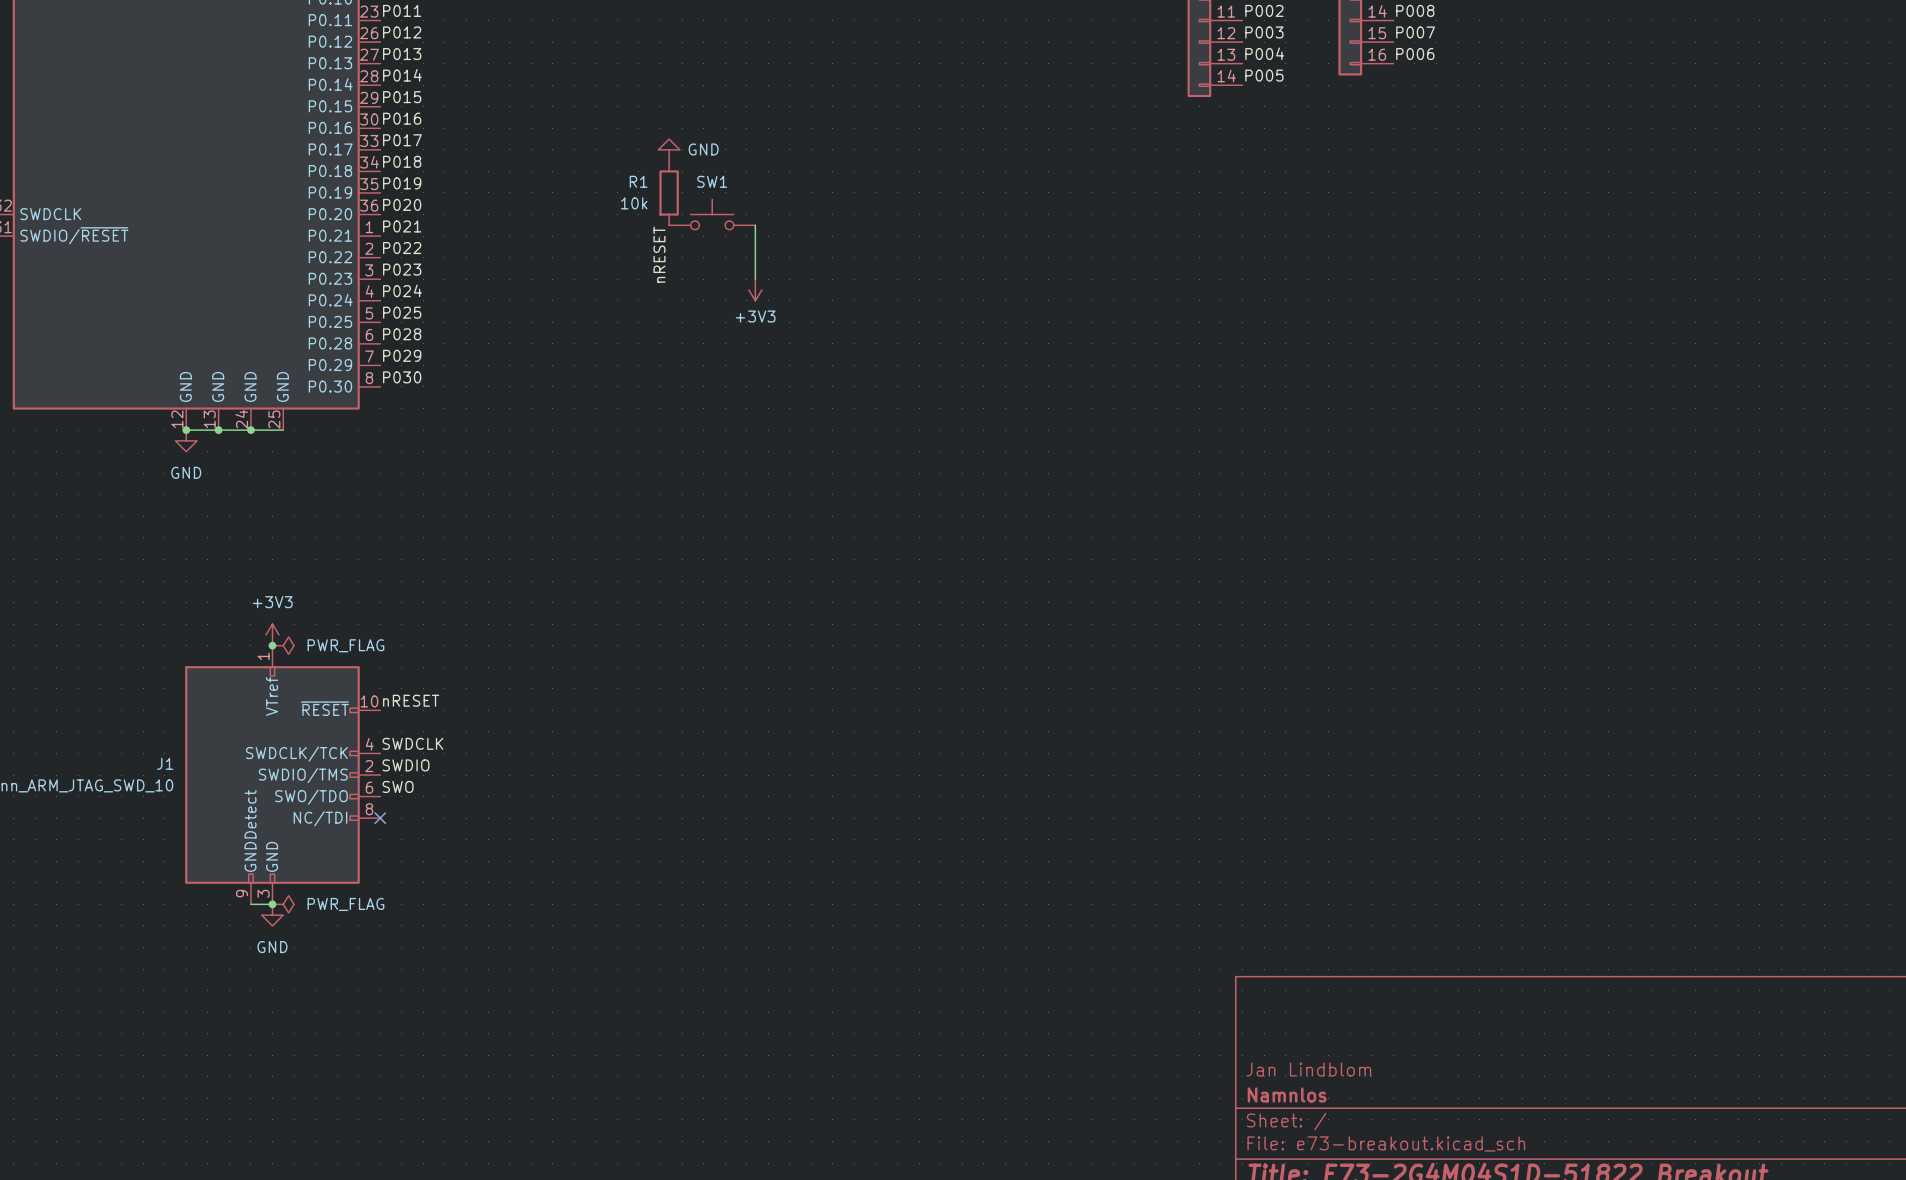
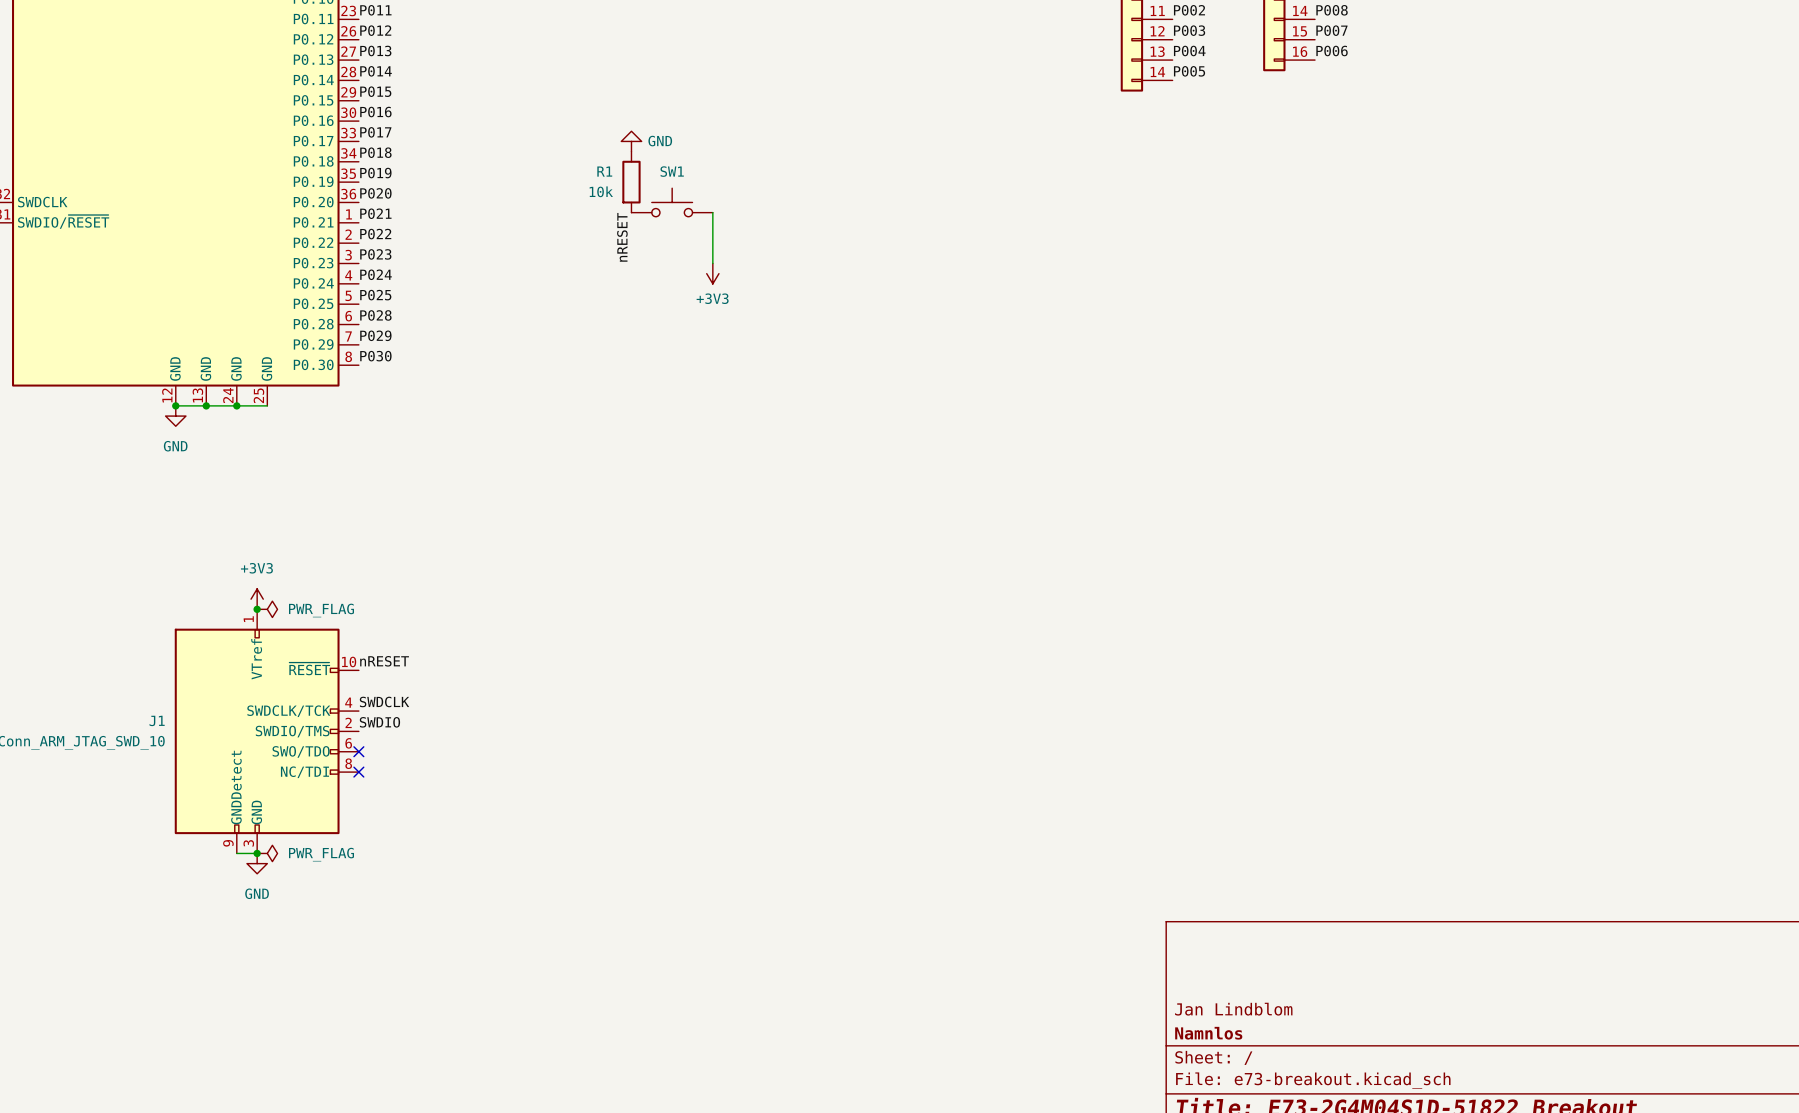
label: SWO (398, 786) -> none
no-connect mark: none -> (358, 751)

